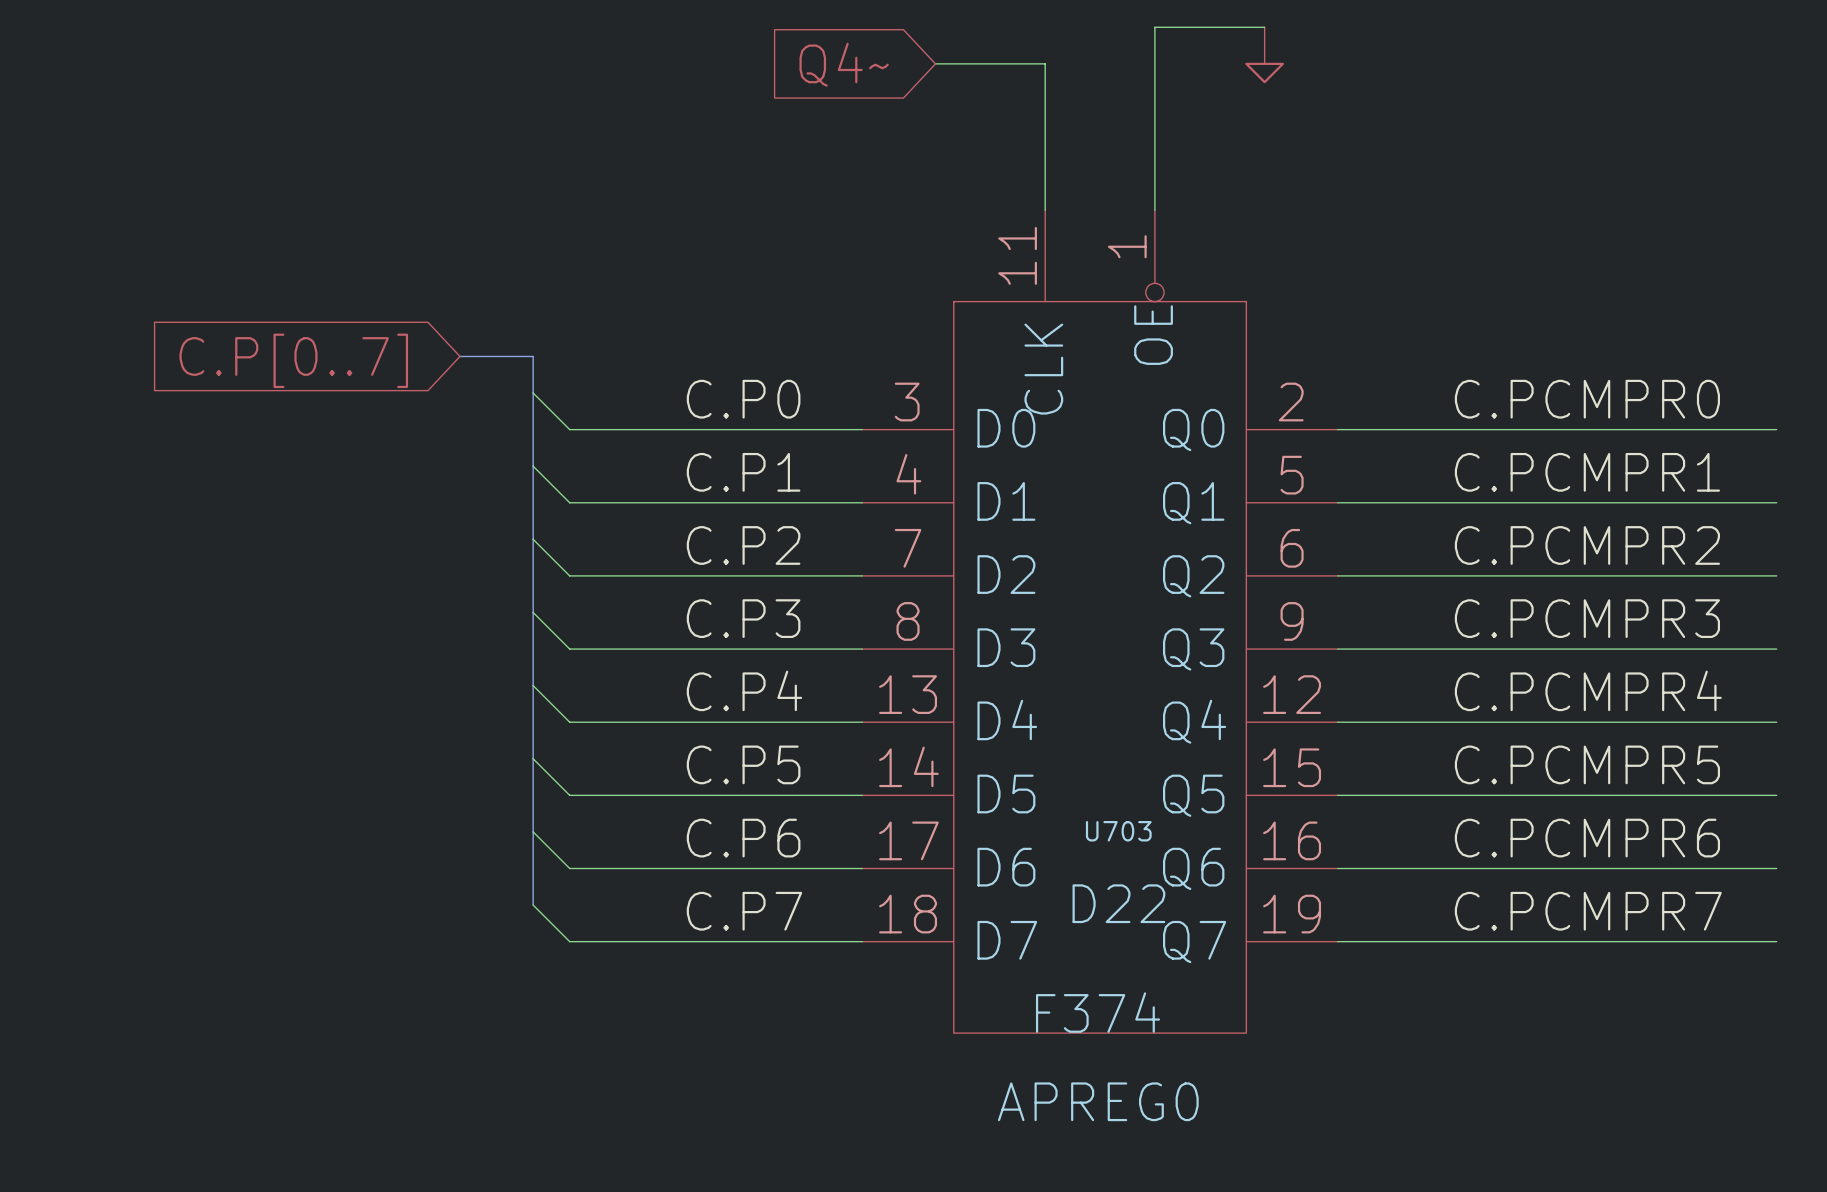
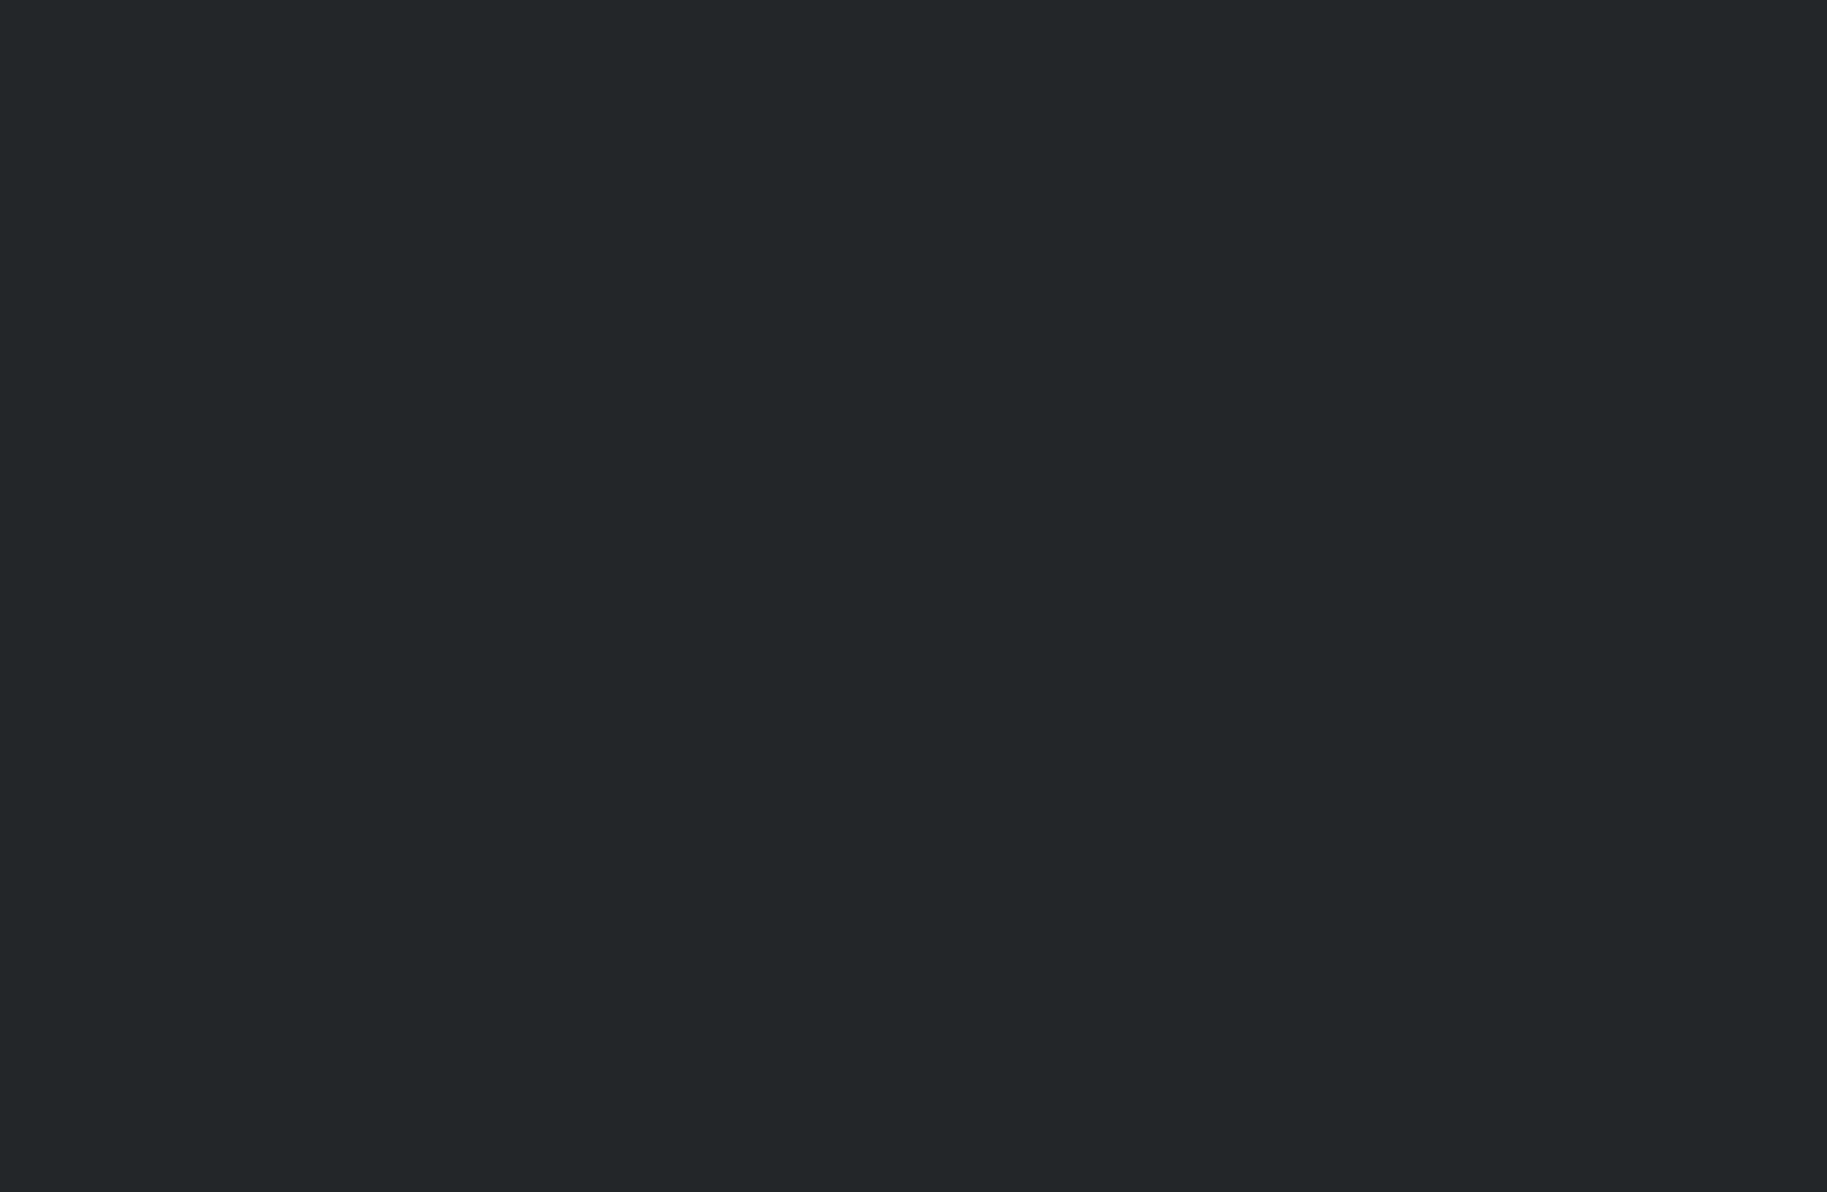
wire: (1264, 27) (1154, 27) (1154, 210) -> none
power symbol: (1264, 55) -> none
wire: (935, 63) (1045, 63) (1045, 210) -> none
global label: Q4~ (844, 64) -> none
bus: (460, 356) (533, 356) (533, 905) -> none
global label: C.P[0..7] (293, 360) -> none
wire: (533, 393) (569, 429) (862, 429) -> none
label: C.P0 (743, 399) -> none
label: C.PCMPR0 (1587, 399) -> none
wire: (1337, 429) (1776, 429) -> none
wire: (533, 466) (569, 502) (862, 502) -> none
label: C.P1 (743, 472) -> none
label: C.PCMPR1 (1587, 472) -> none
wire: (1337, 502) (1776, 502) -> none
wire: (533, 539) (569, 575) (862, 575) -> none
label: C.P2 (743, 545) -> none
label: C.PCMPR2 (1587, 545) -> none
wire: (1337, 575) (1776, 575) -> none
wire: (533, 612) (569, 649) (862, 649) -> none
label: C.P3 (743, 618) -> none
label: C.PCMPR3 (1587, 618) -> none
U703: F374 (1100, 621) -> none
wire: (1337, 649) (1776, 649) -> none
wire: (533, 685) (569, 722) (862, 722) -> none
label: C.P4 (744, 690) -> none
label: C.PCMPR4 (1588, 690) -> none
wire: (1337, 722) (1776, 722) -> none
wire: (533, 758) (569, 795) (862, 795) -> none
label: C.P5 (743, 764) -> none
label: C.PCMPR5 (1587, 764) -> none
wire: (1337, 795) (1776, 795) -> none
wire: (533, 831) (569, 868) (862, 868) -> none
label: C.P6 (743, 838) -> none
label: C.PCMPR6 (1587, 838) -> none
wire: (1337, 868) (1776, 868) -> none
wire: (533, 905) (569, 941) (862, 941) -> none
label: C.P7 (744, 911) -> none
label: C.PCMPR7 (1588, 911) -> none
wire: (1337, 941) (1776, 941) -> none

